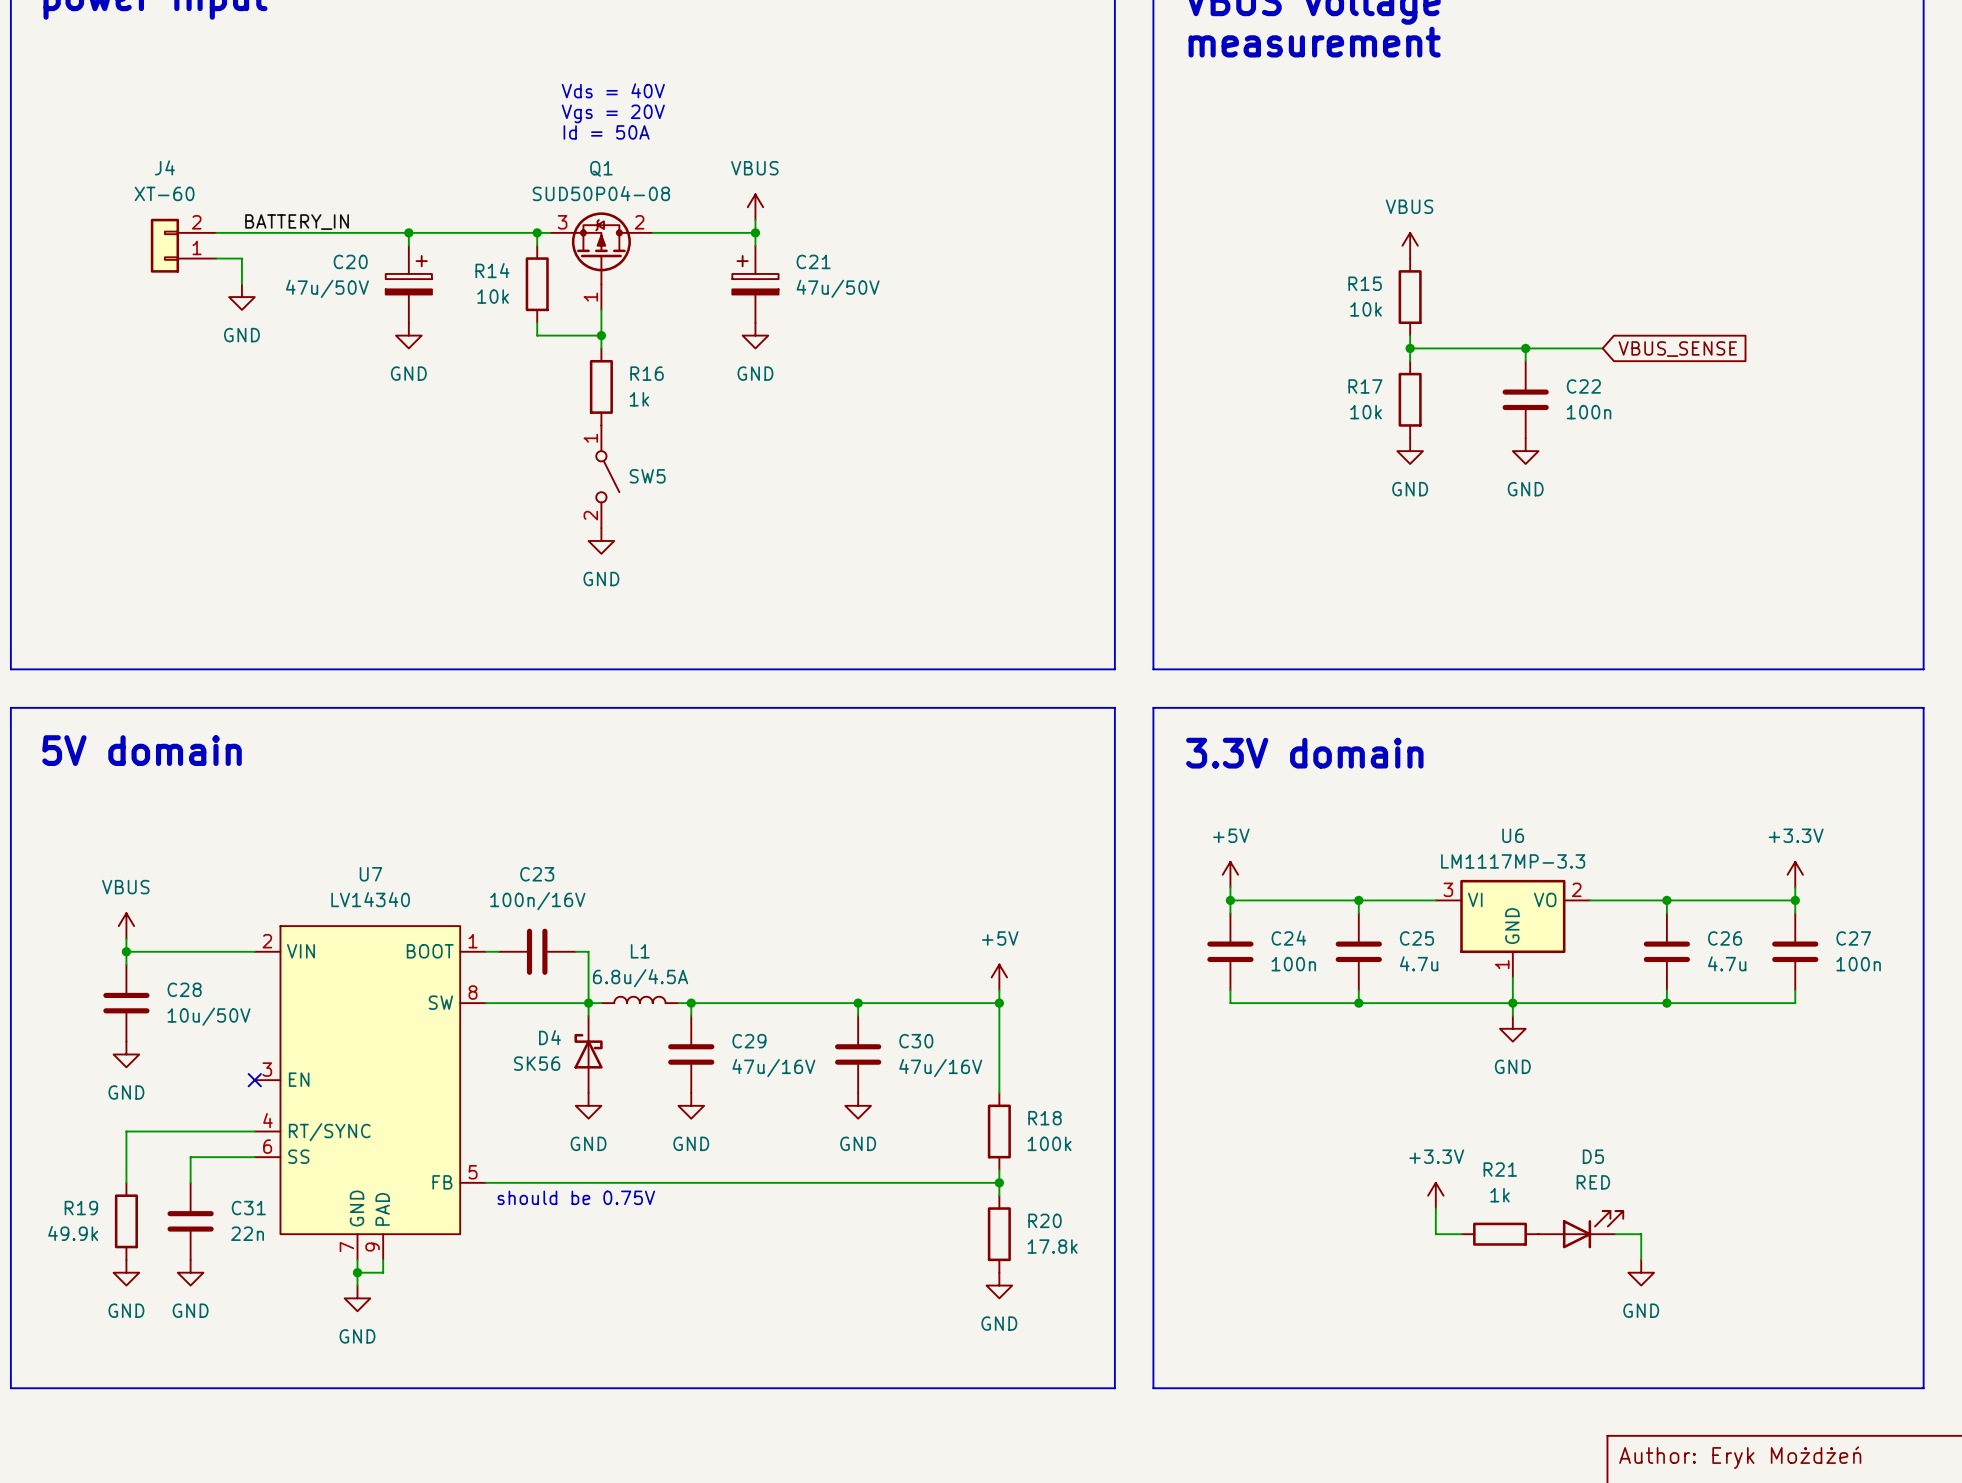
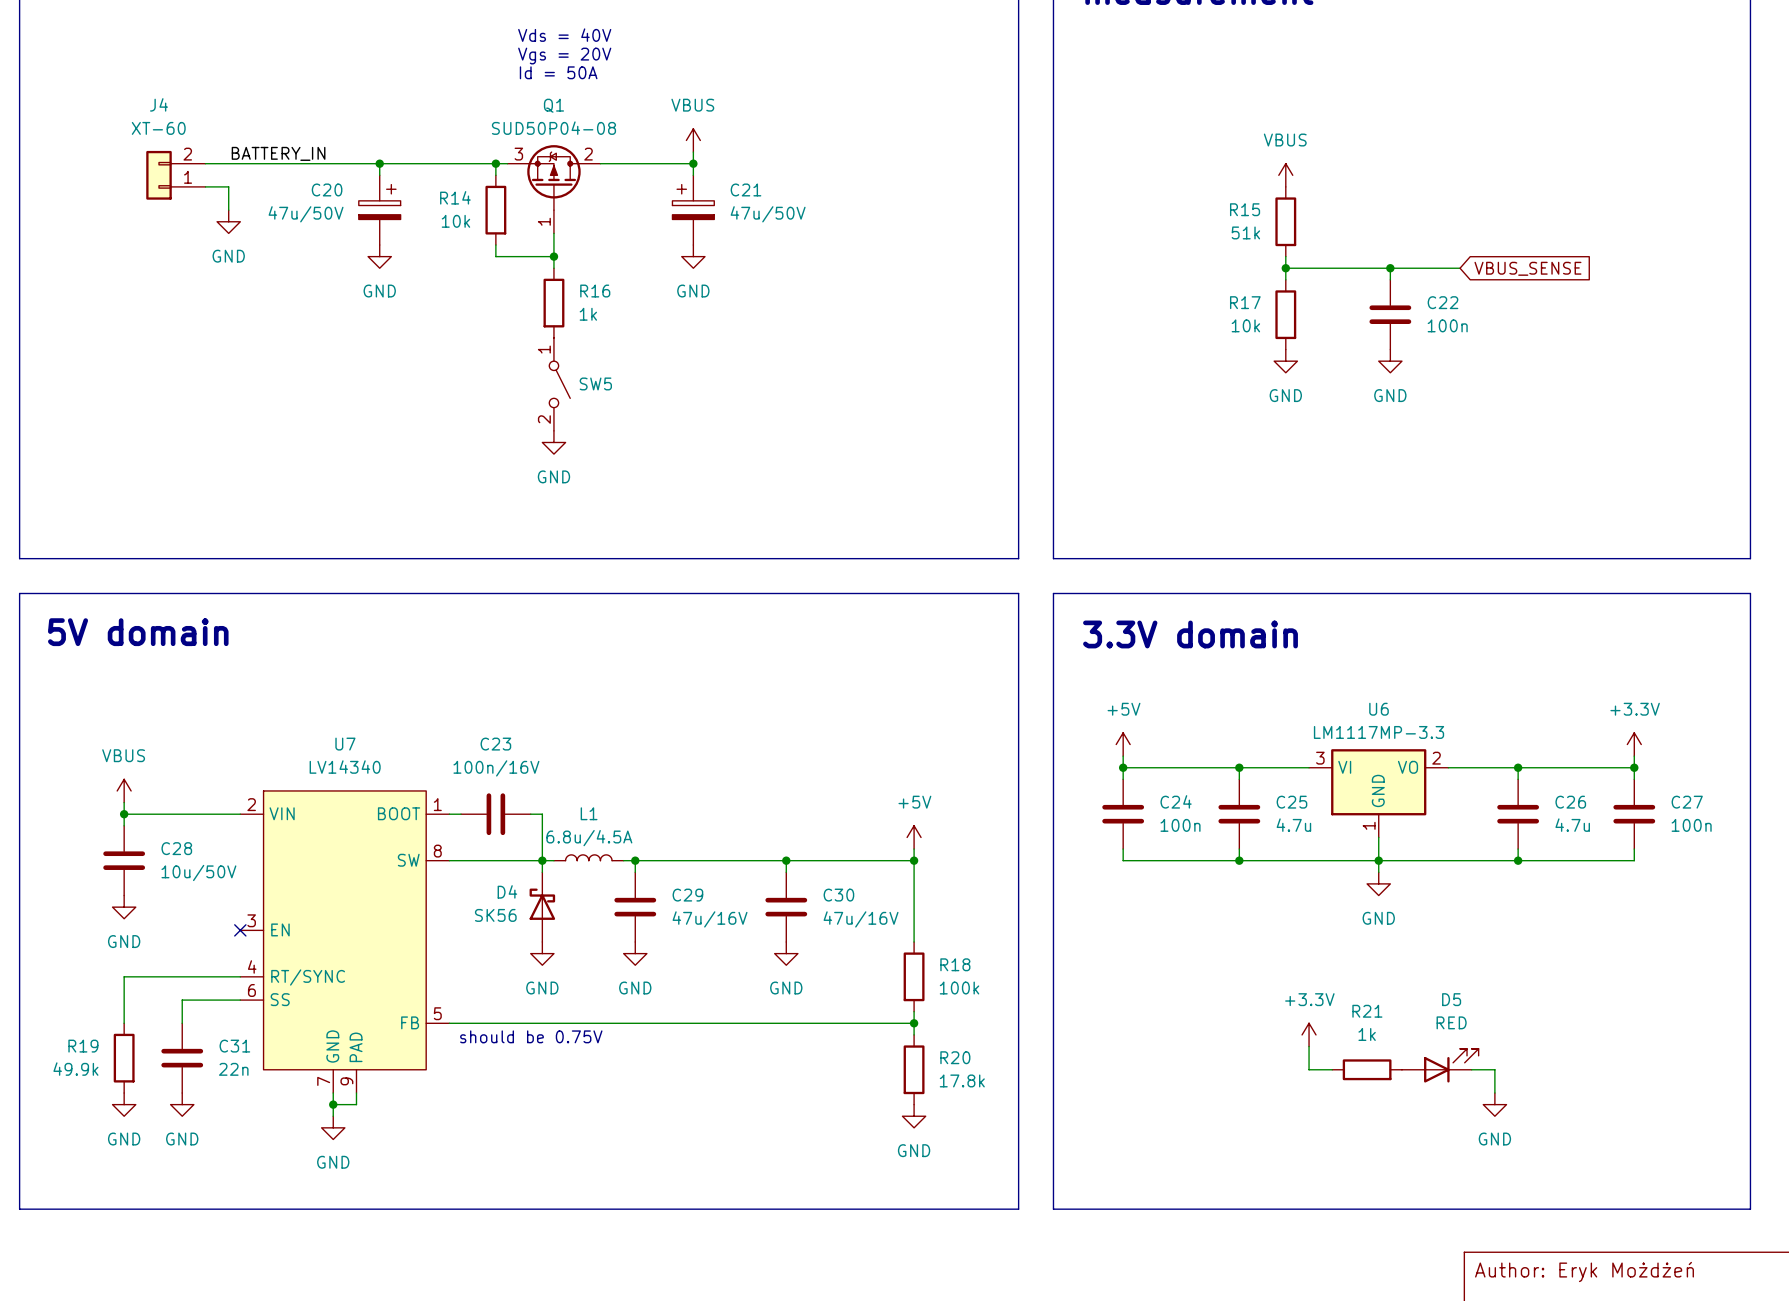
R15 value: 10k (1366, 309) -> 51k (1245, 232)

